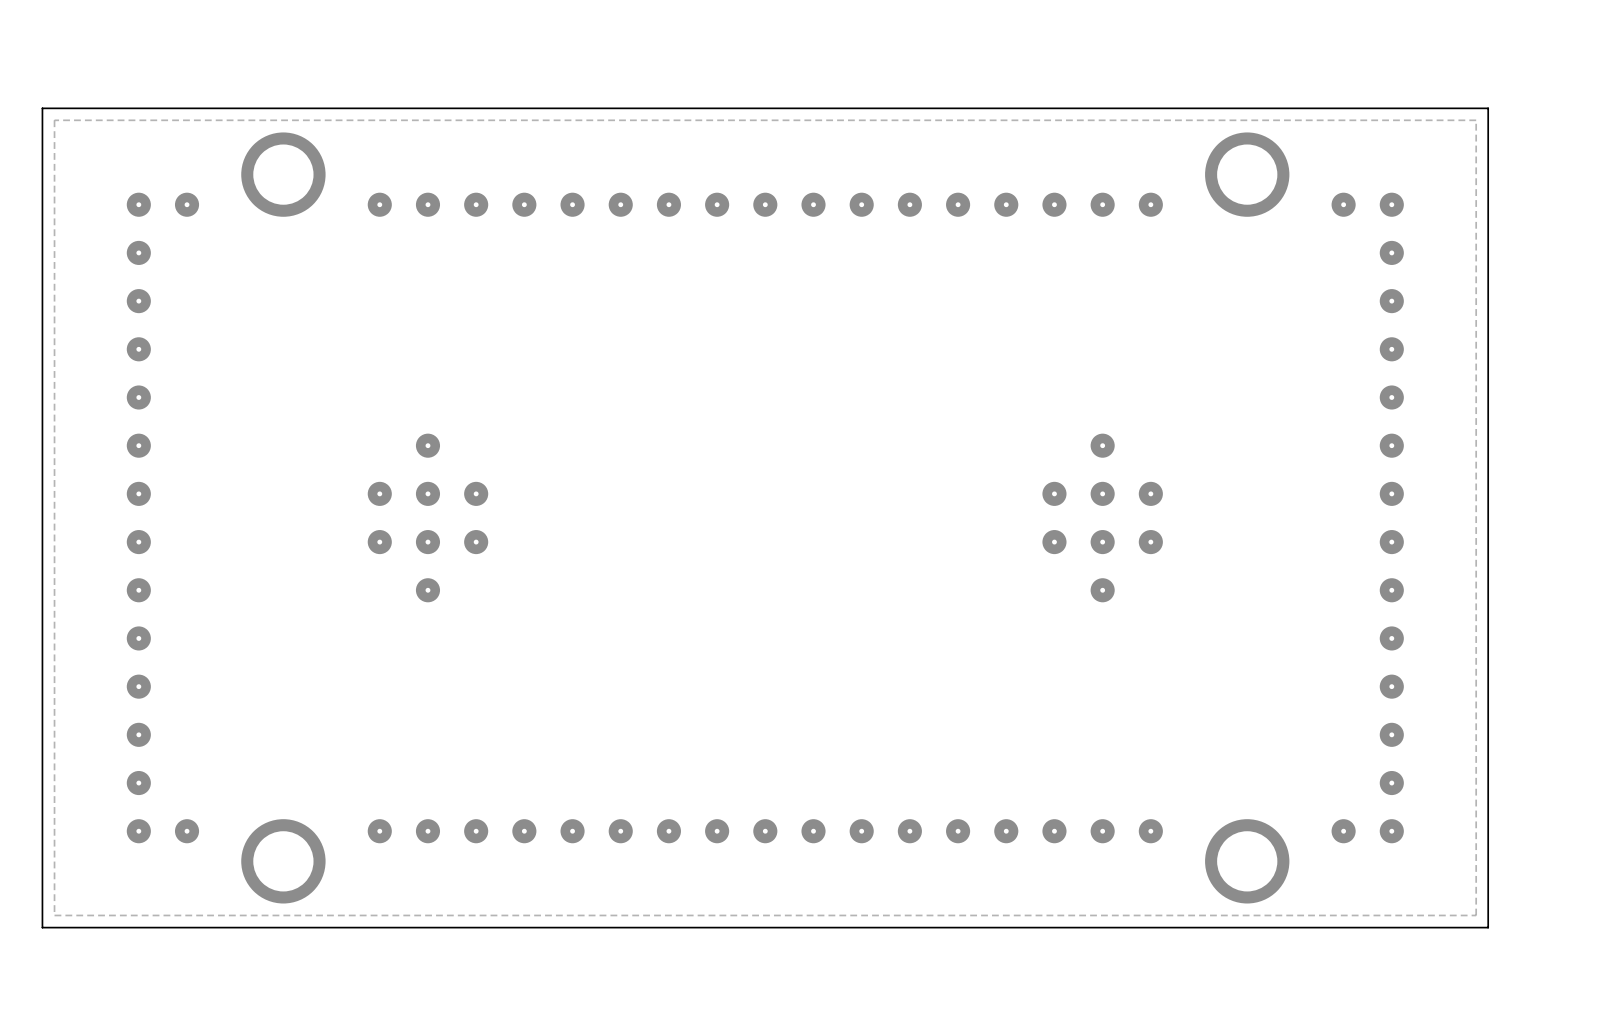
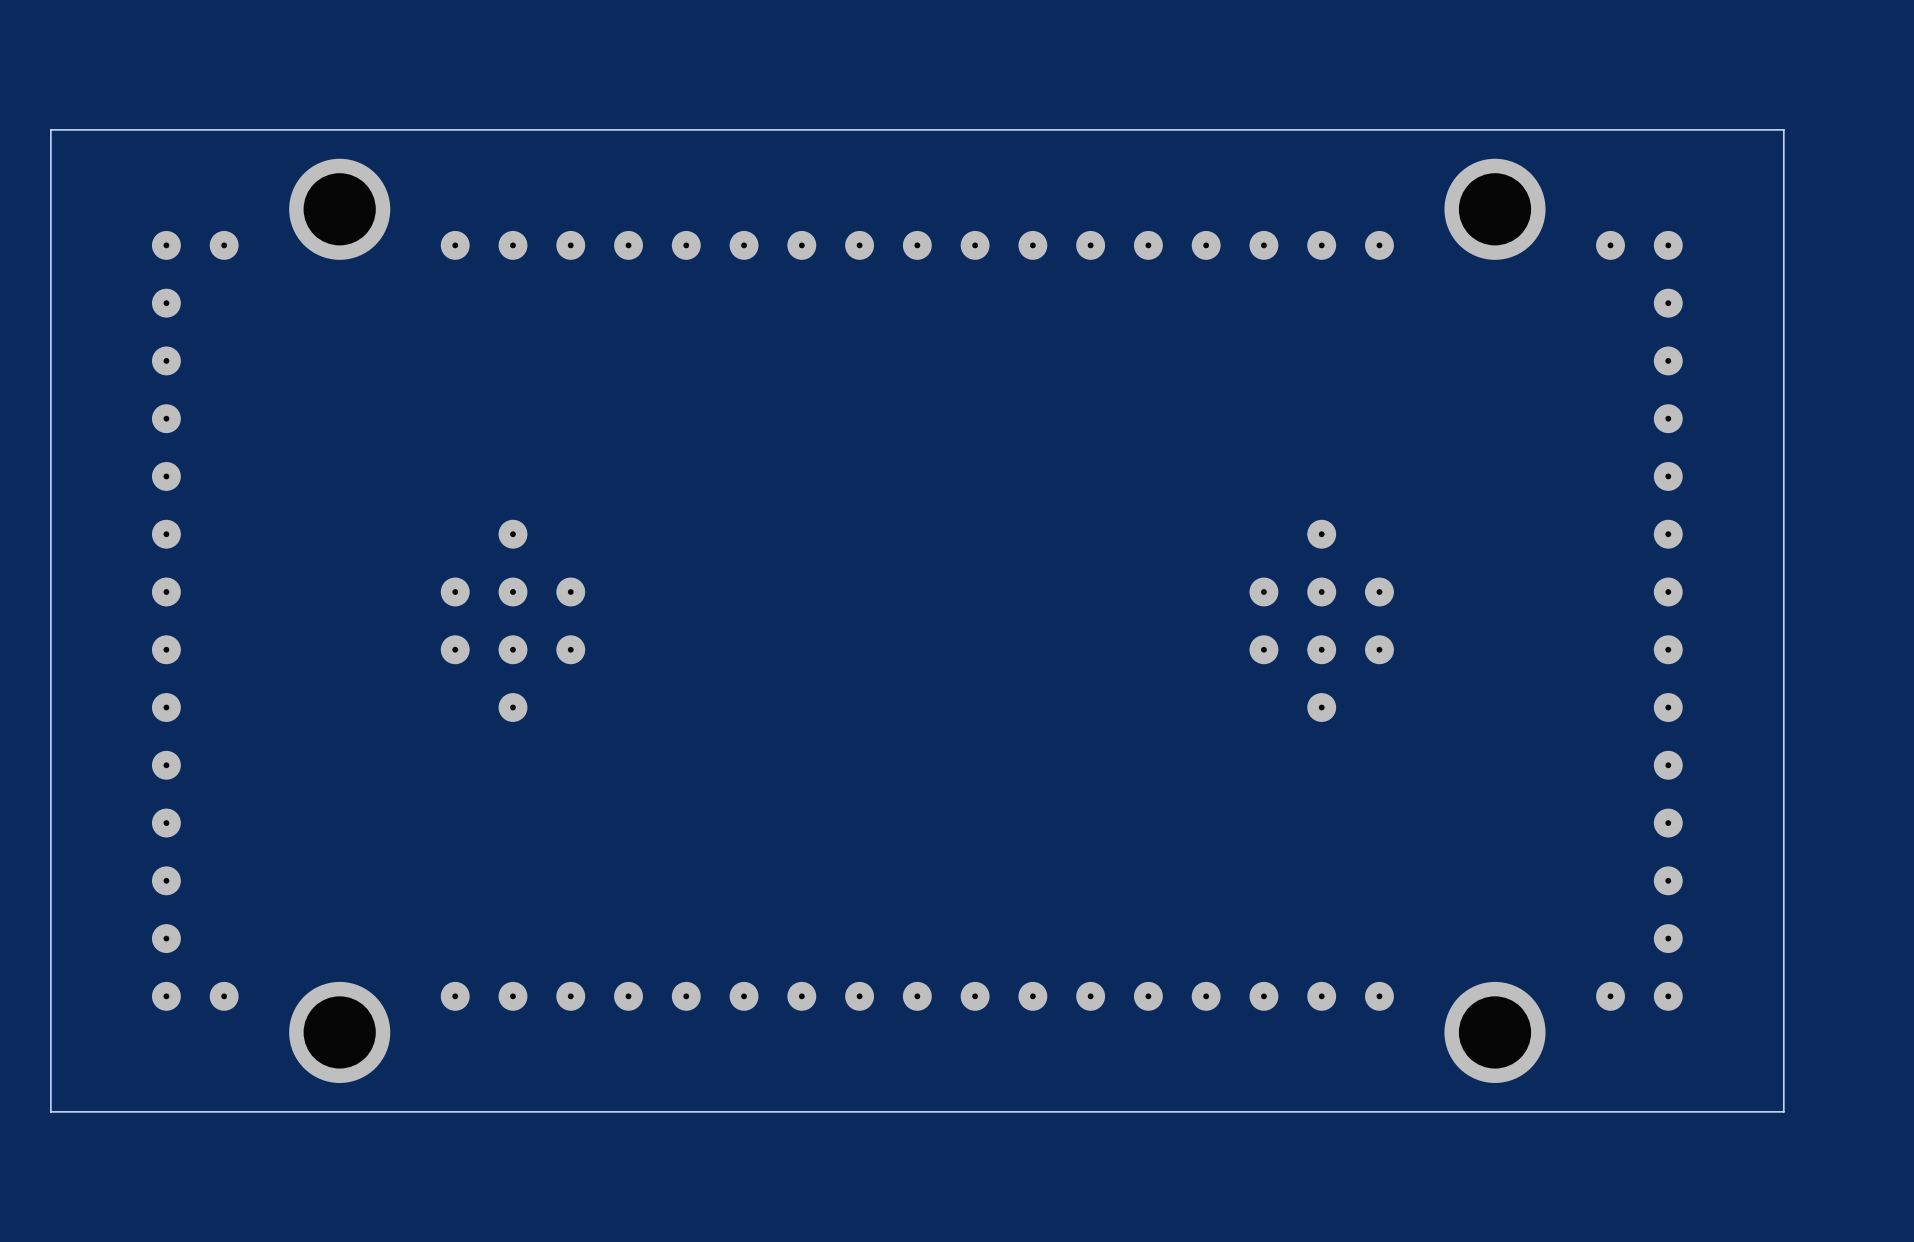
zone outline: (1476, 120) (54, 120) (54, 915) (1476, 915) (1476, 120) -> none

